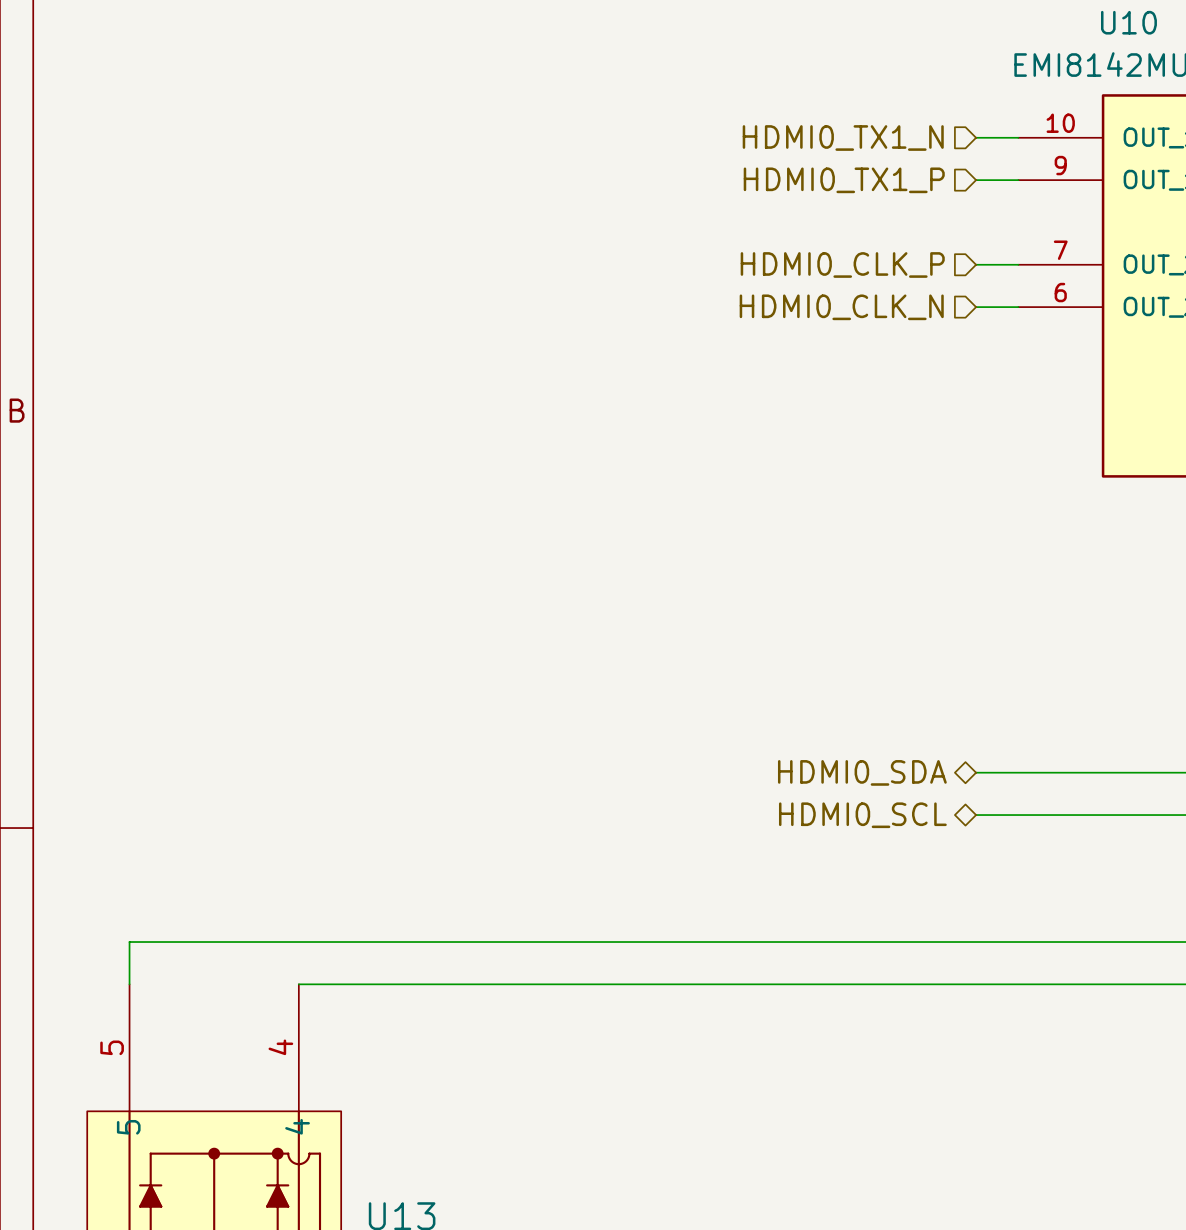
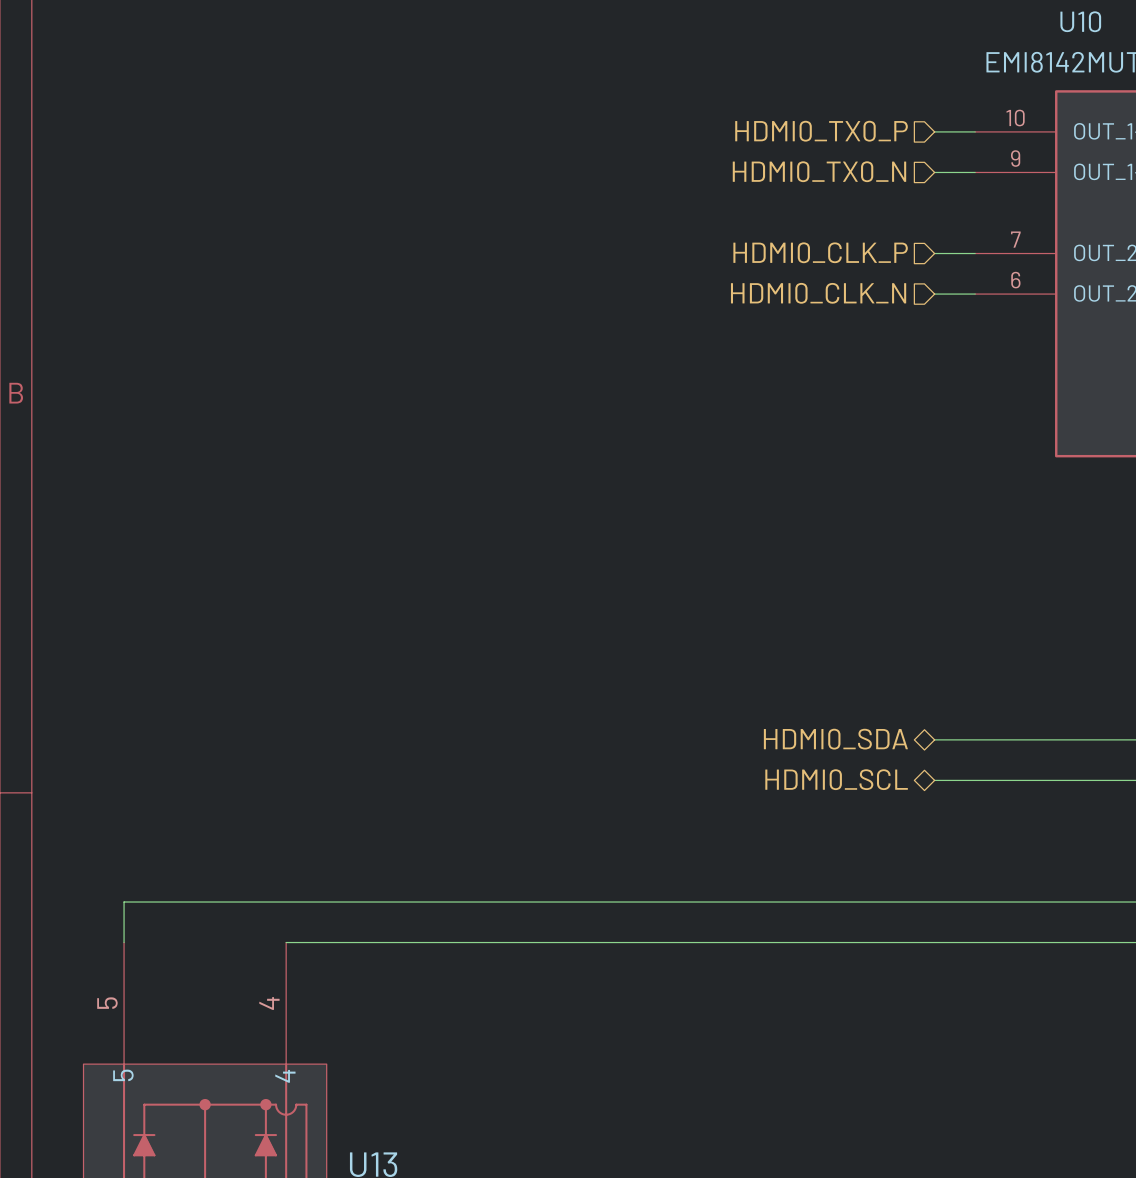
hierarchical label: HDMI0_TX1_N (843, 138) -> HDMI0_TX0_P (821, 131)
hierarchical label: HDMI0_TX1_P (844, 180) -> HDMI0_TX0_N (819, 171)

